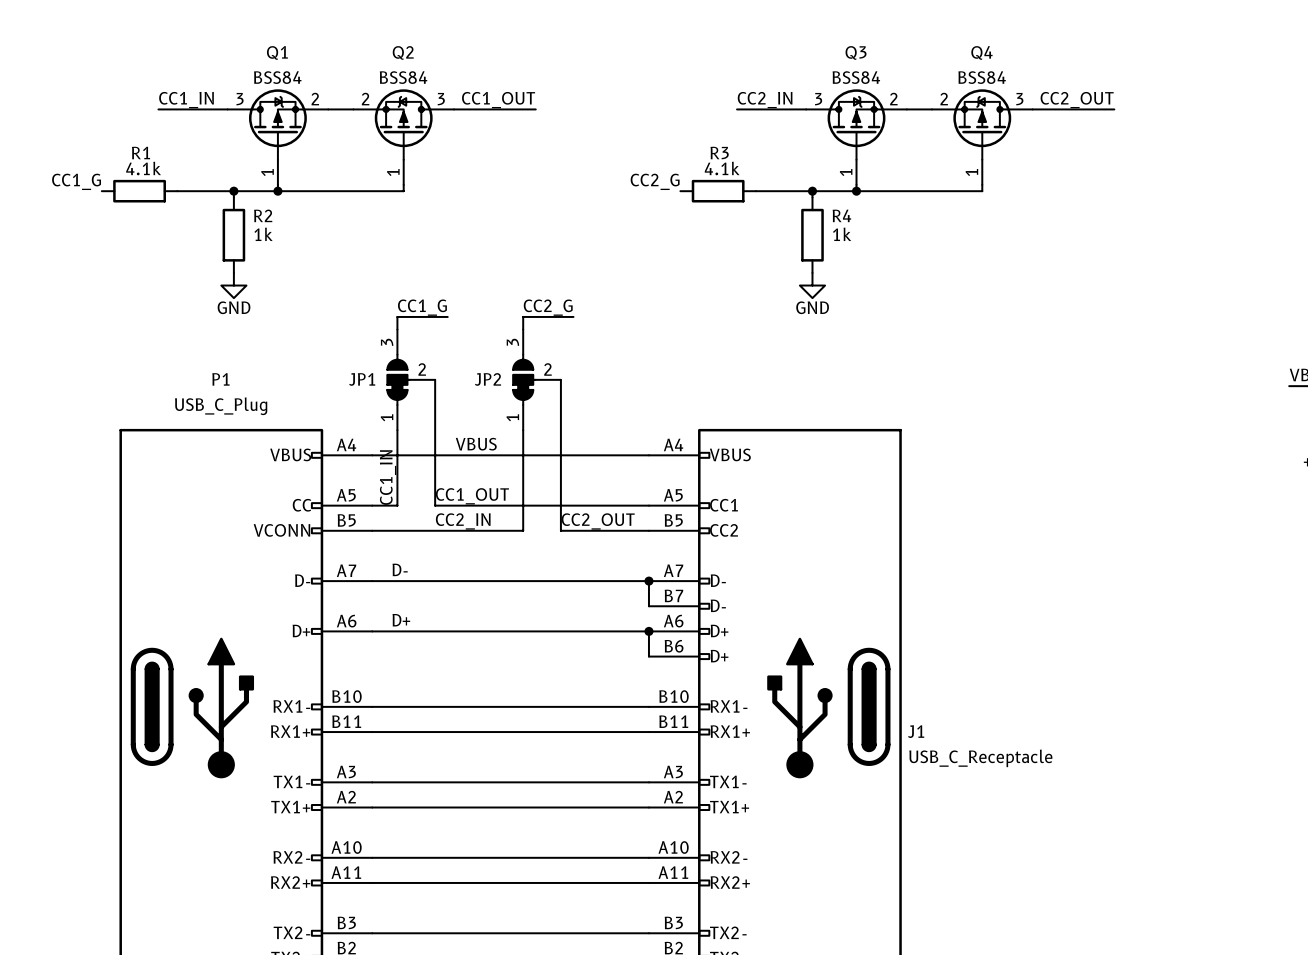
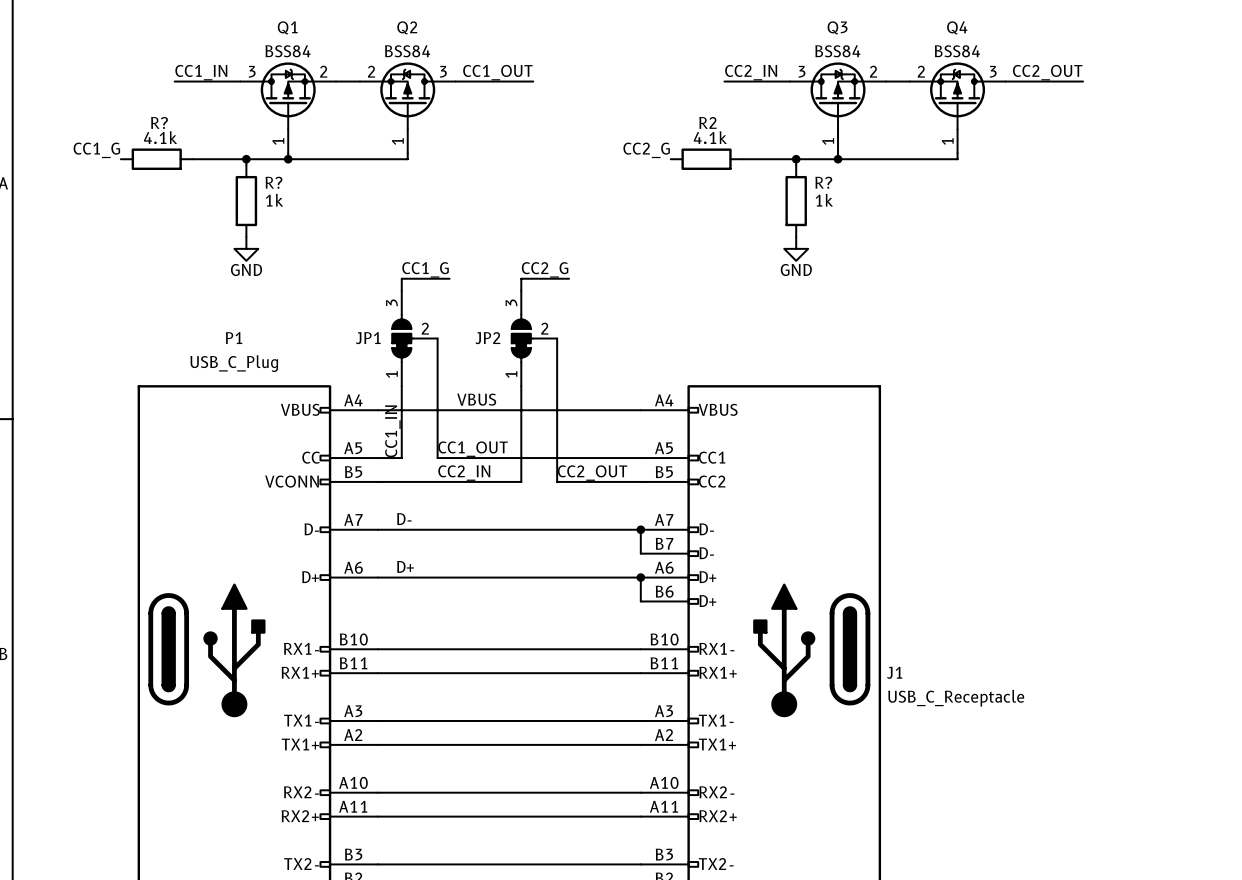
R1 name: R1 (141, 152) -> R? (159, 122)
R3 name: R3 (719, 153) -> R2 (707, 122)
R2 name: R2 (263, 215) -> R? (273, 182)
R4 name: R4 (841, 215) -> R? (823, 182)

